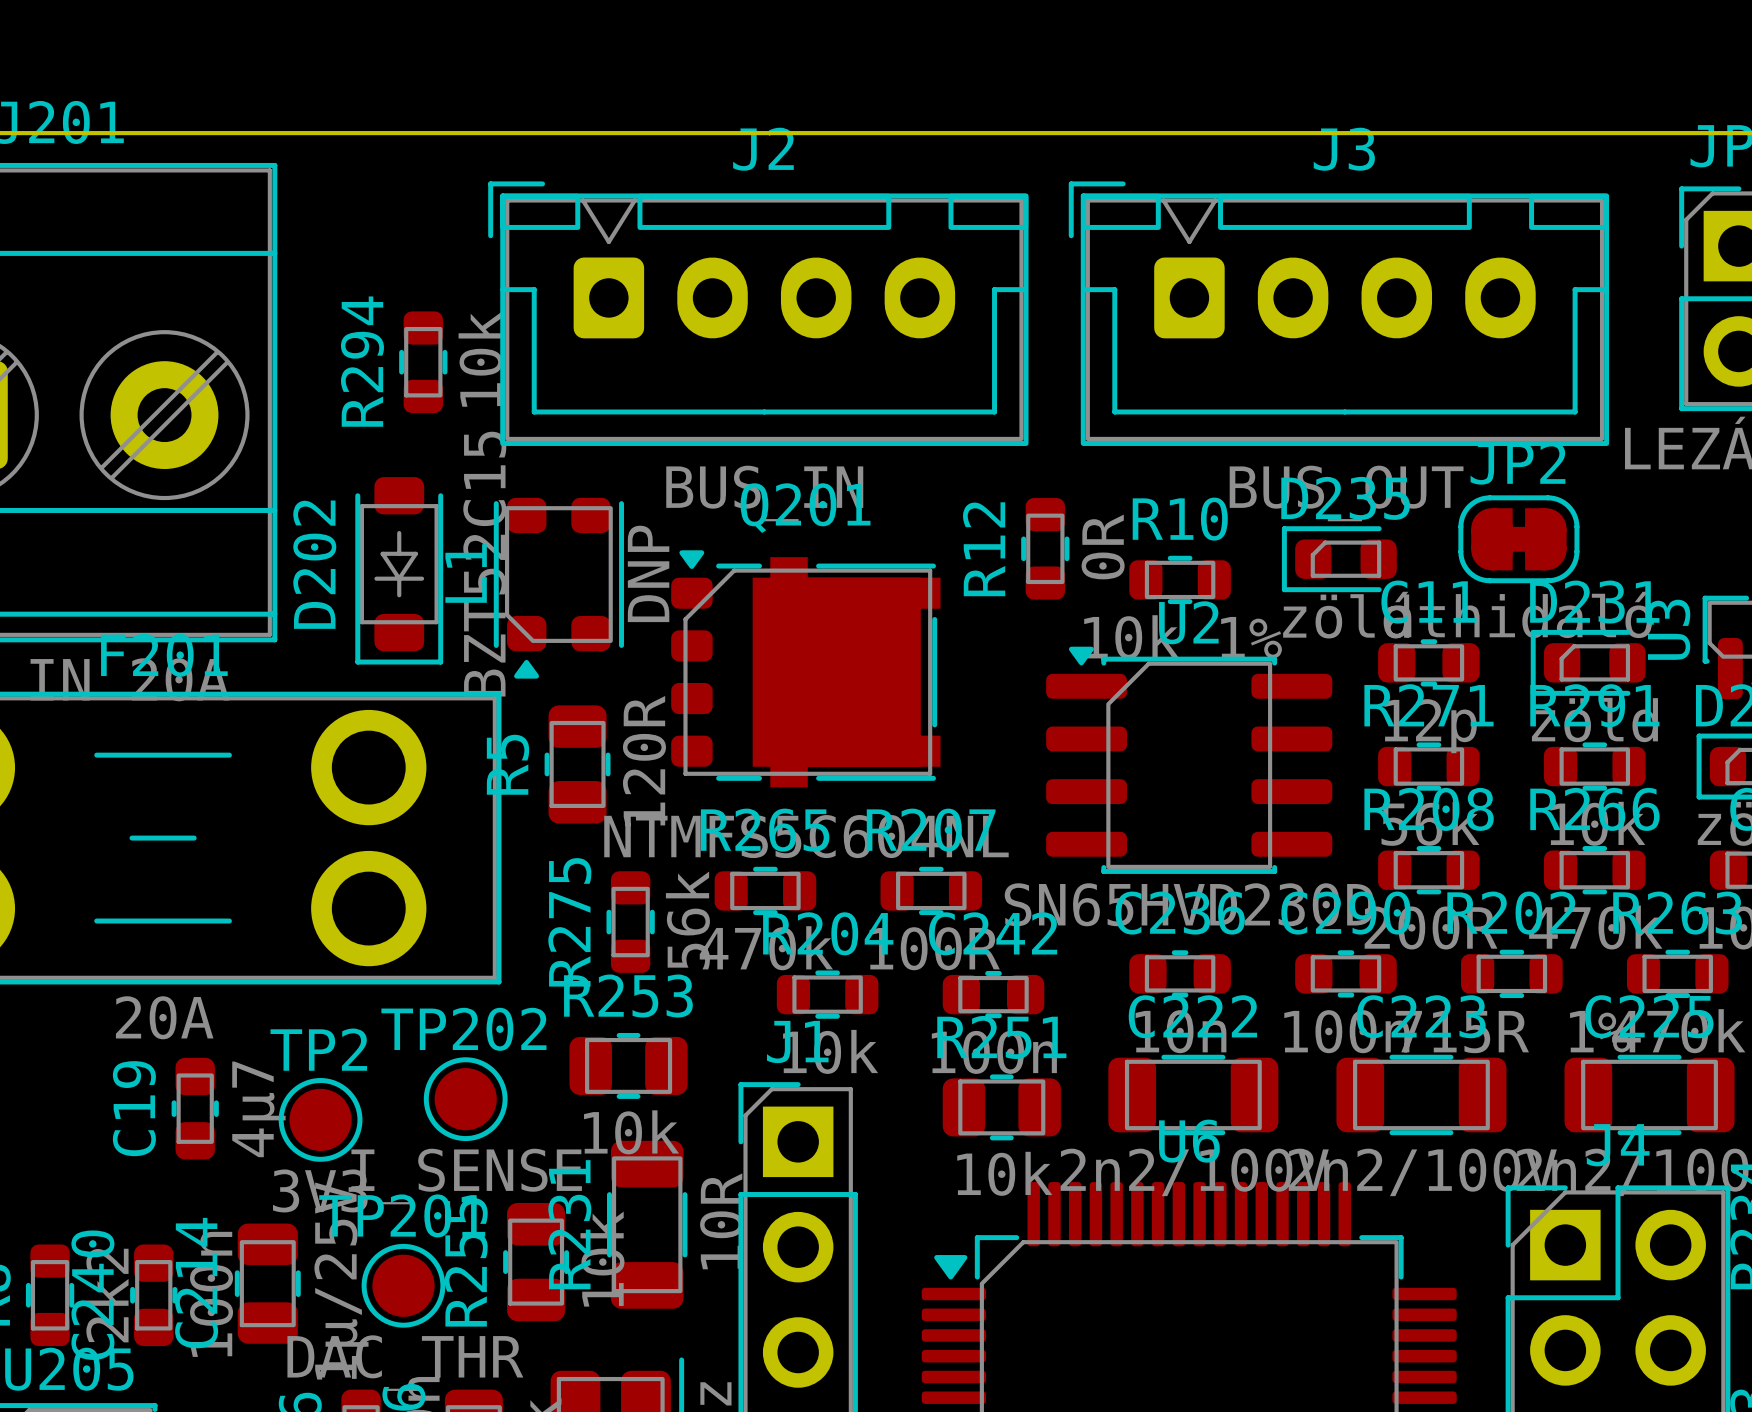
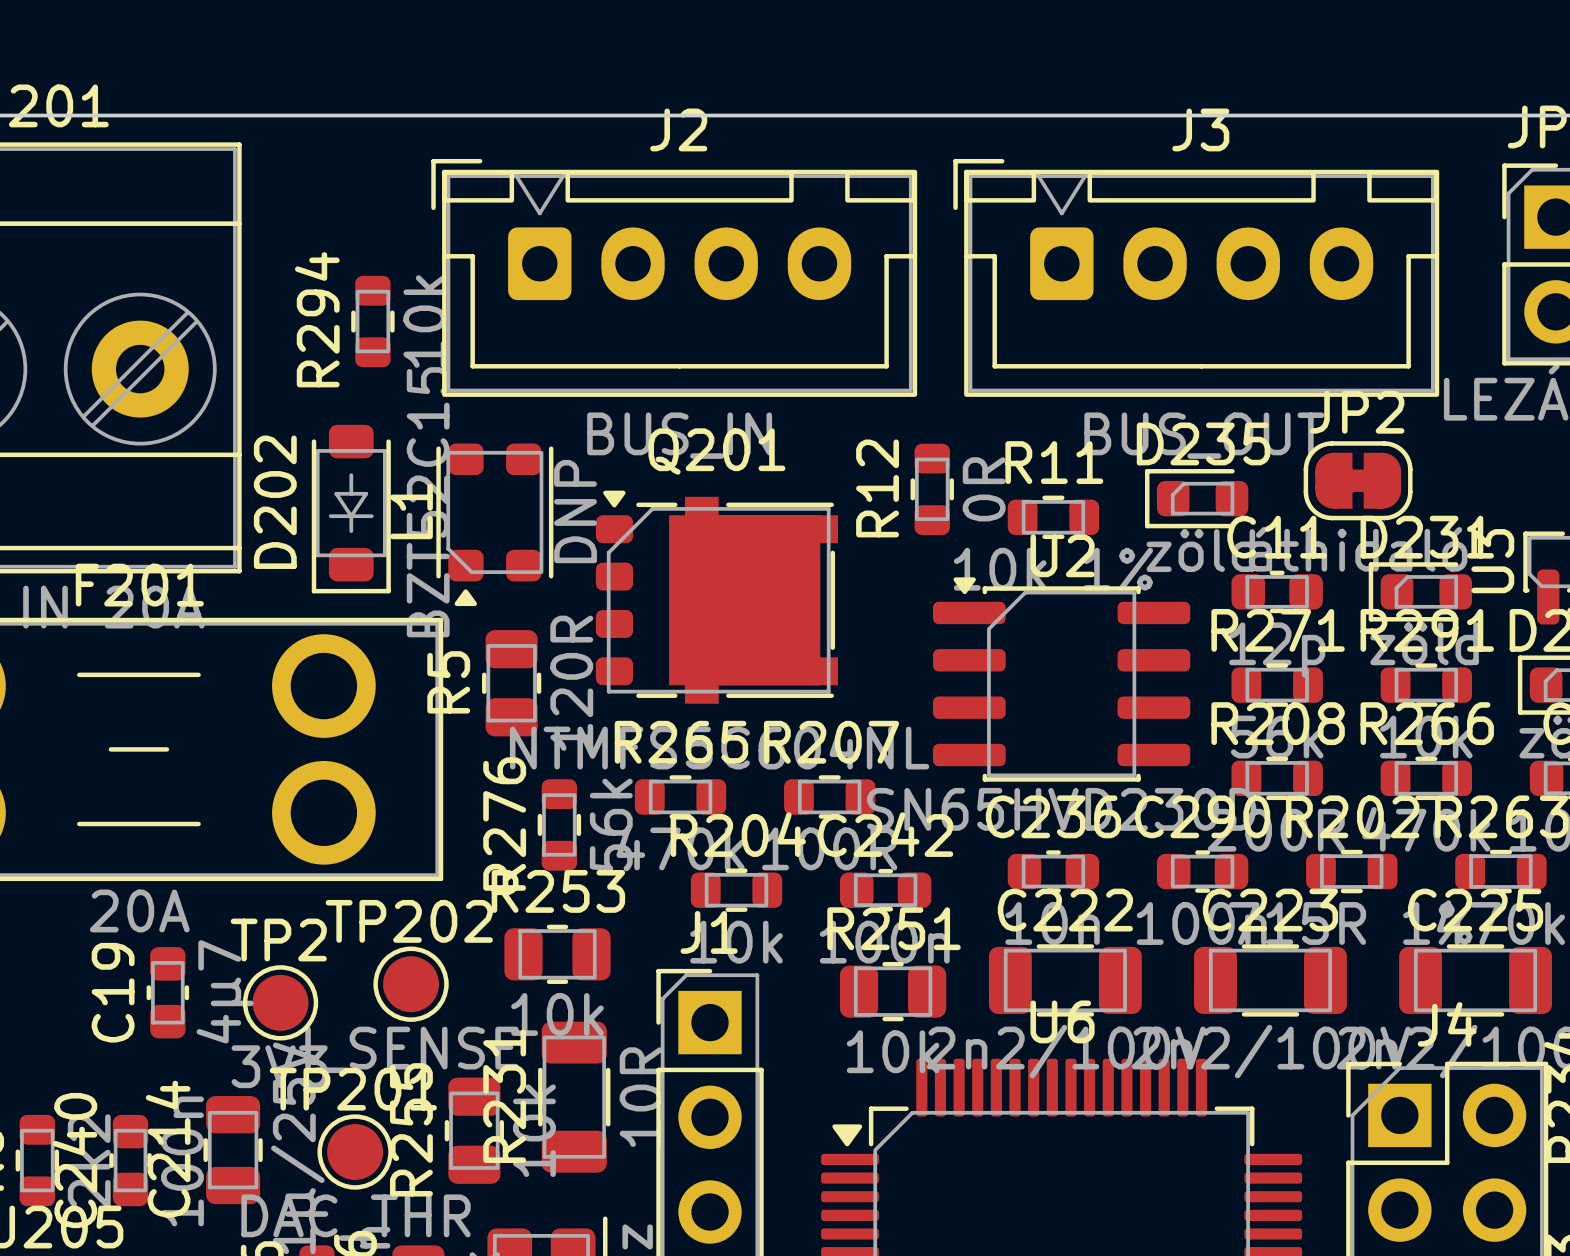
R10 name: R10 (1180, 519) -> R11 (1054, 462)
R275 name: R275 (569, 922) -> R276 (504, 824)

